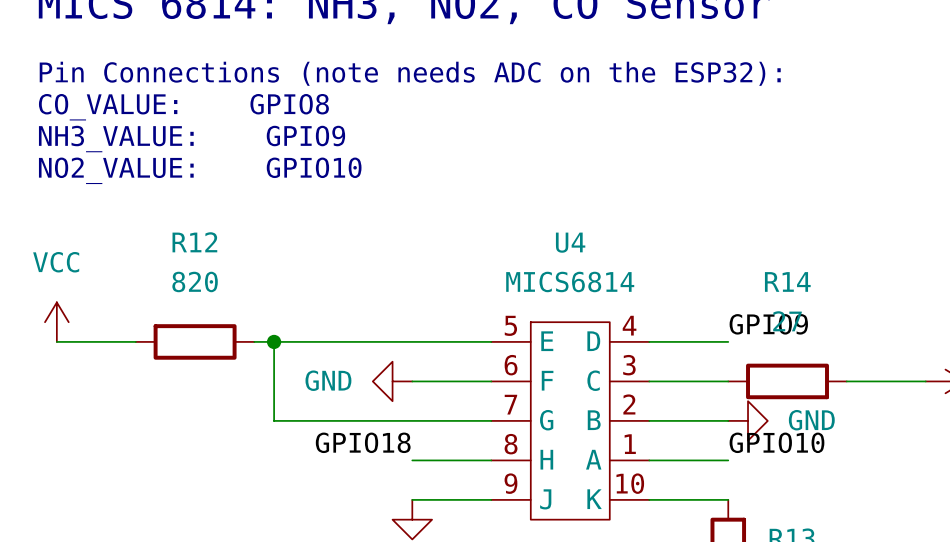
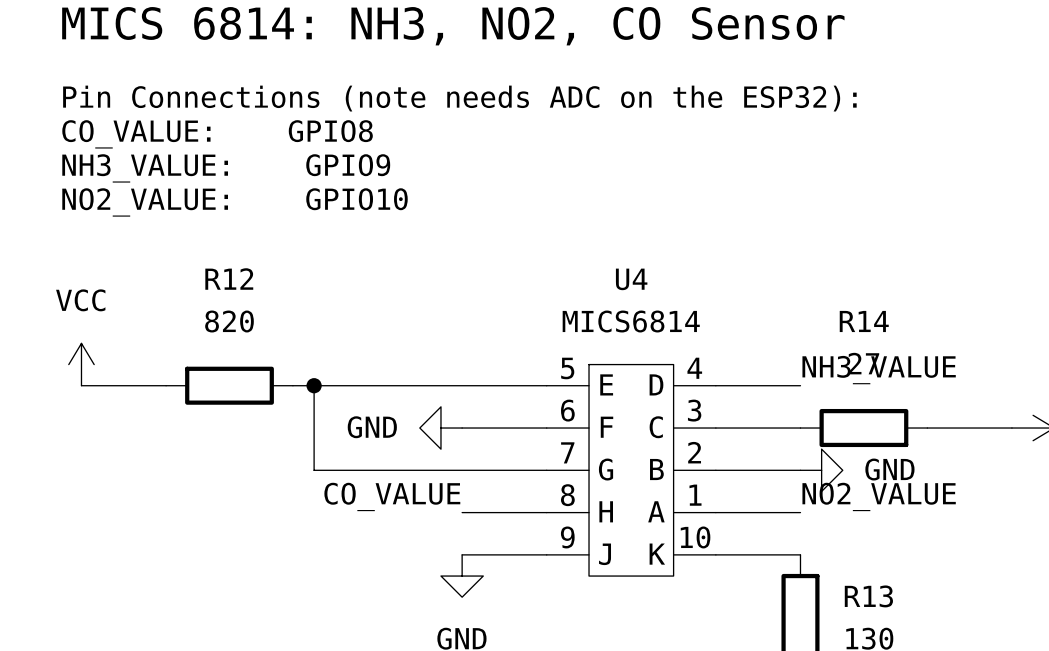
label: GPIO9 (768, 324) -> NH3_VALUE (879, 370)
label: GPIO18 (363, 442) -> CO_VALUE (392, 496)
label: GPIO10 (776, 442) -> NO2_VALUE (879, 496)

